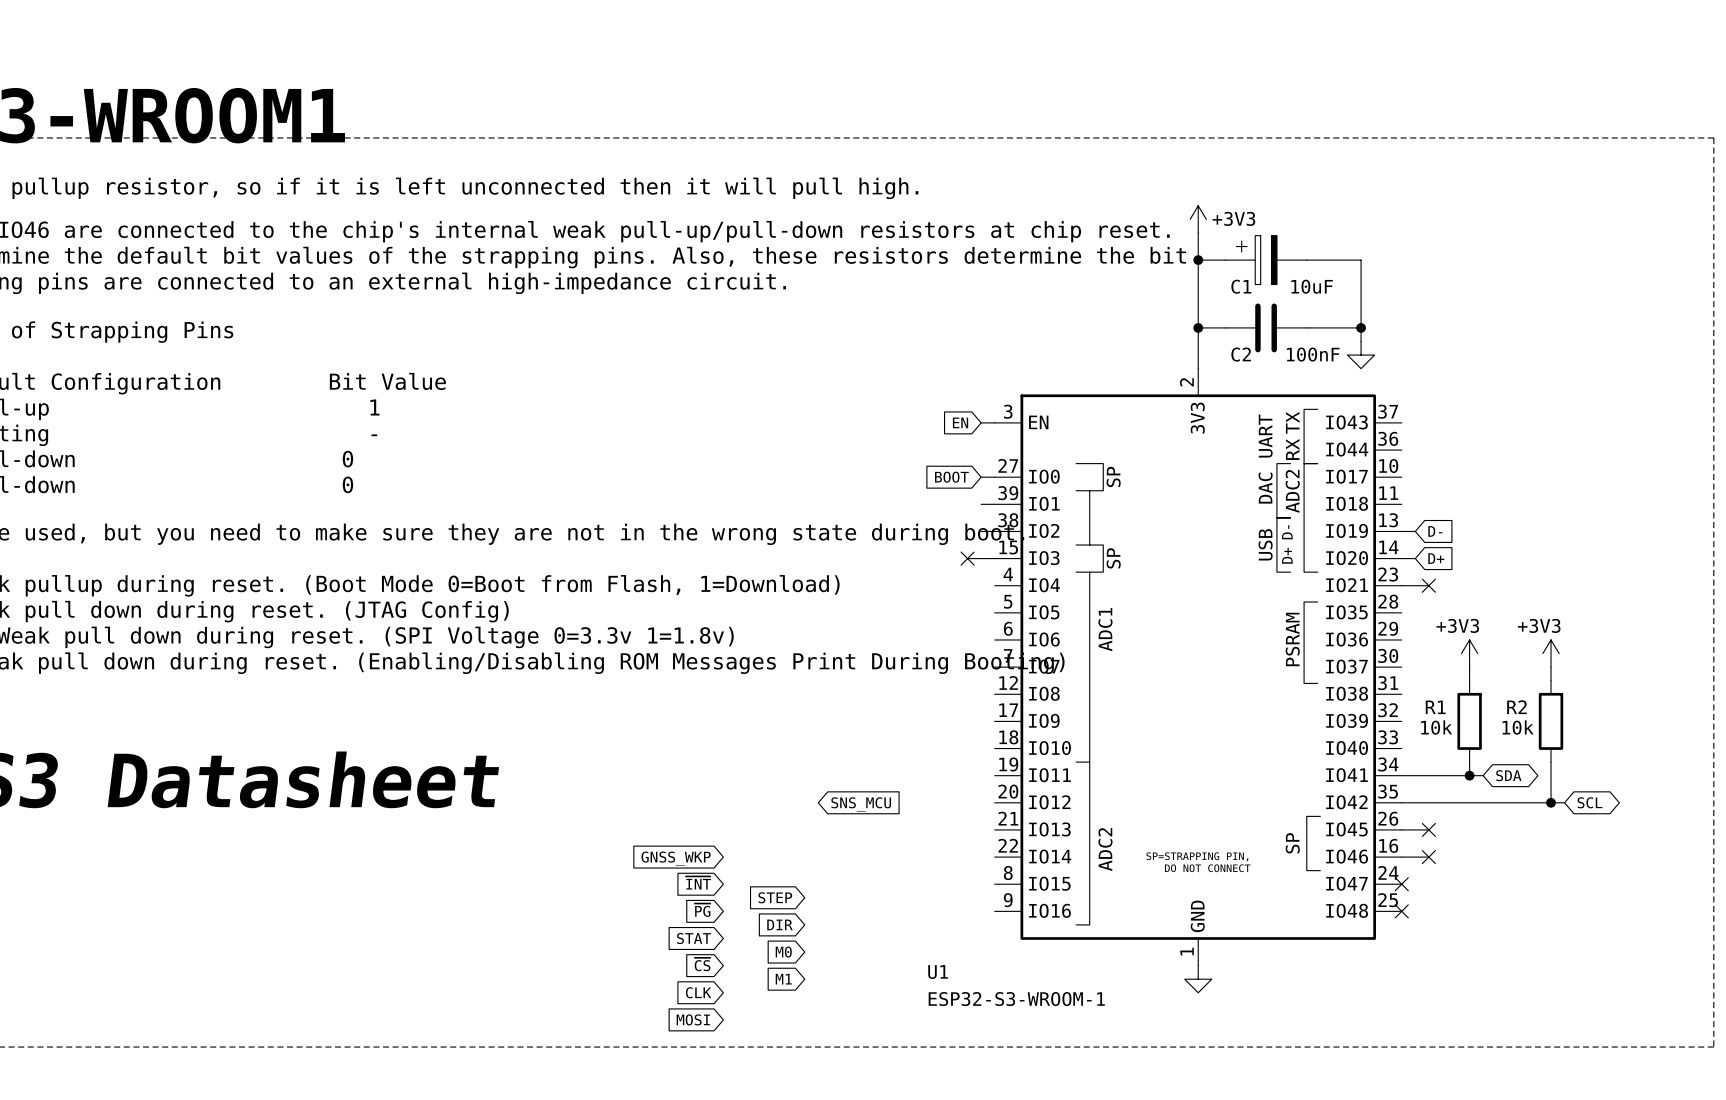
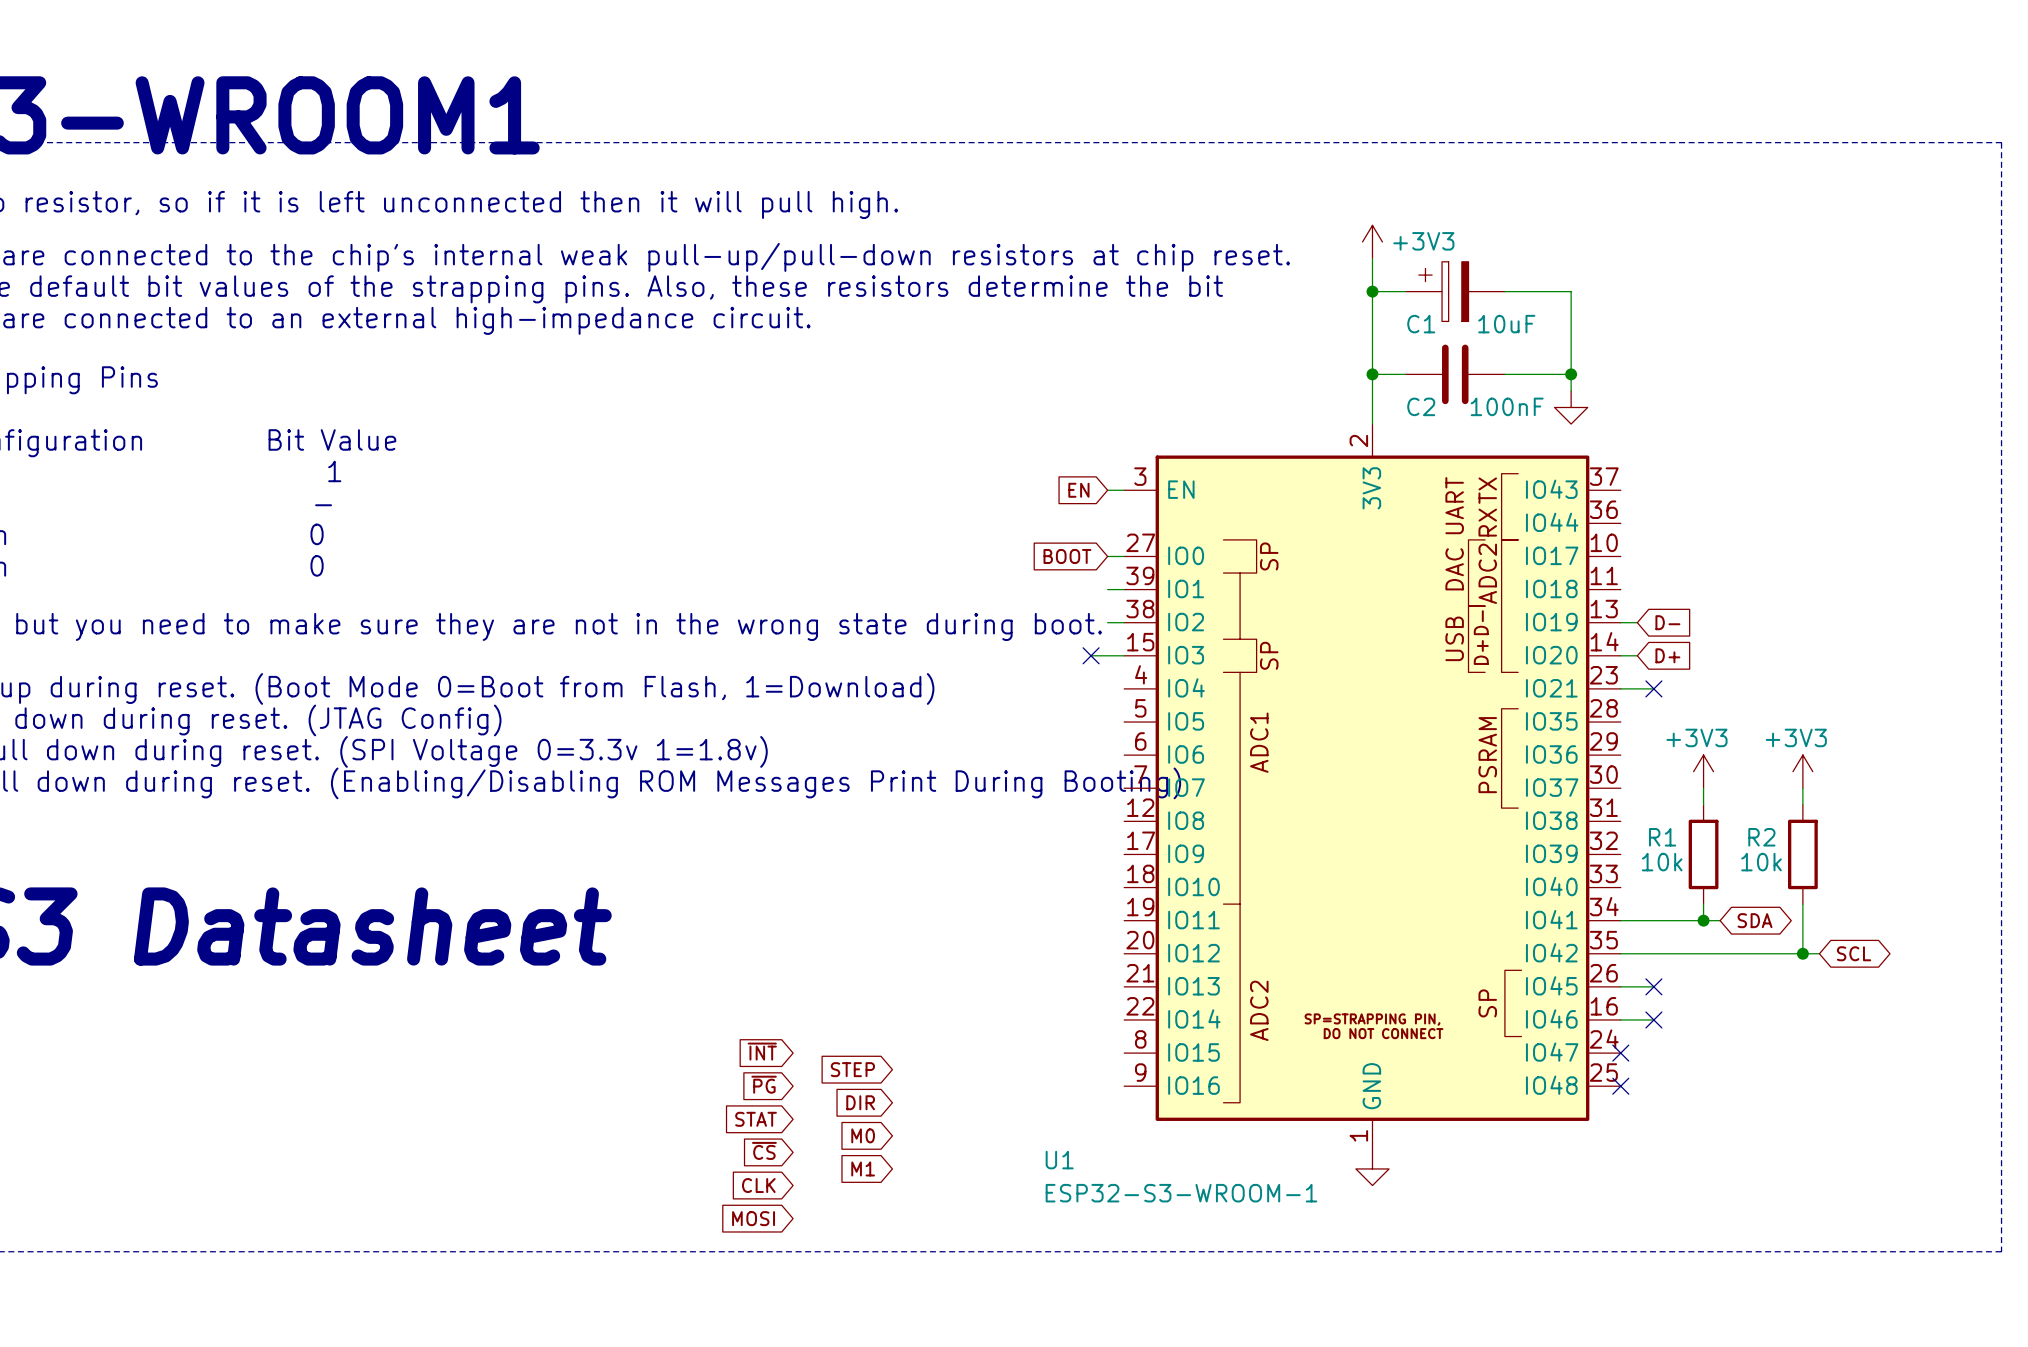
global label: SNS_MCU (861, 804) -> none
global label: GNSS_WKP (676, 858) -> none

